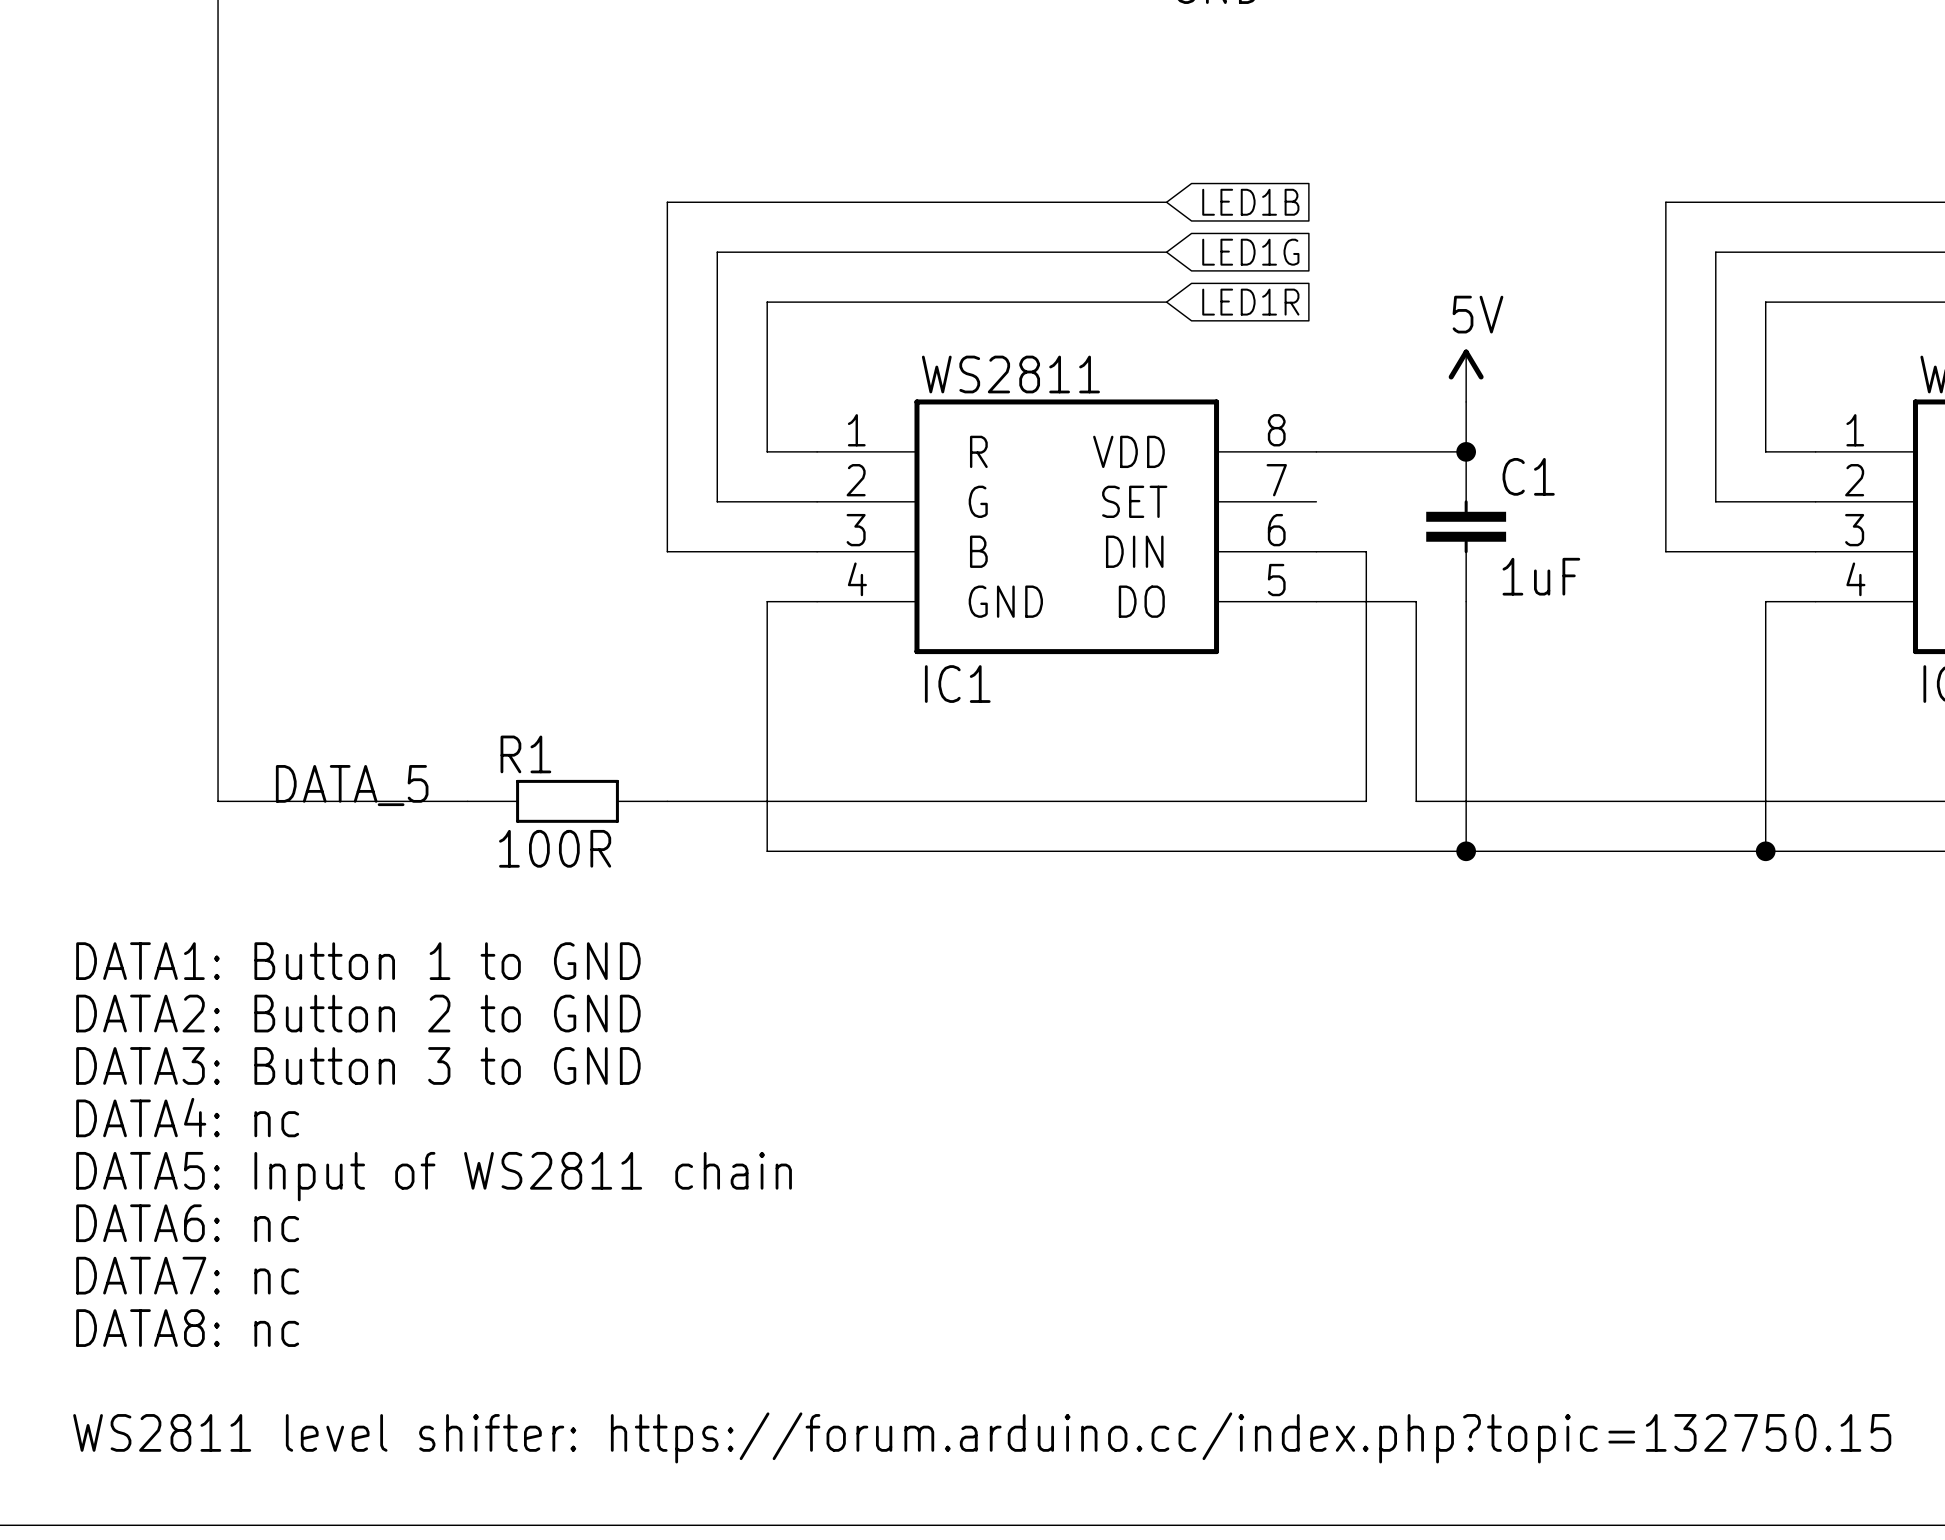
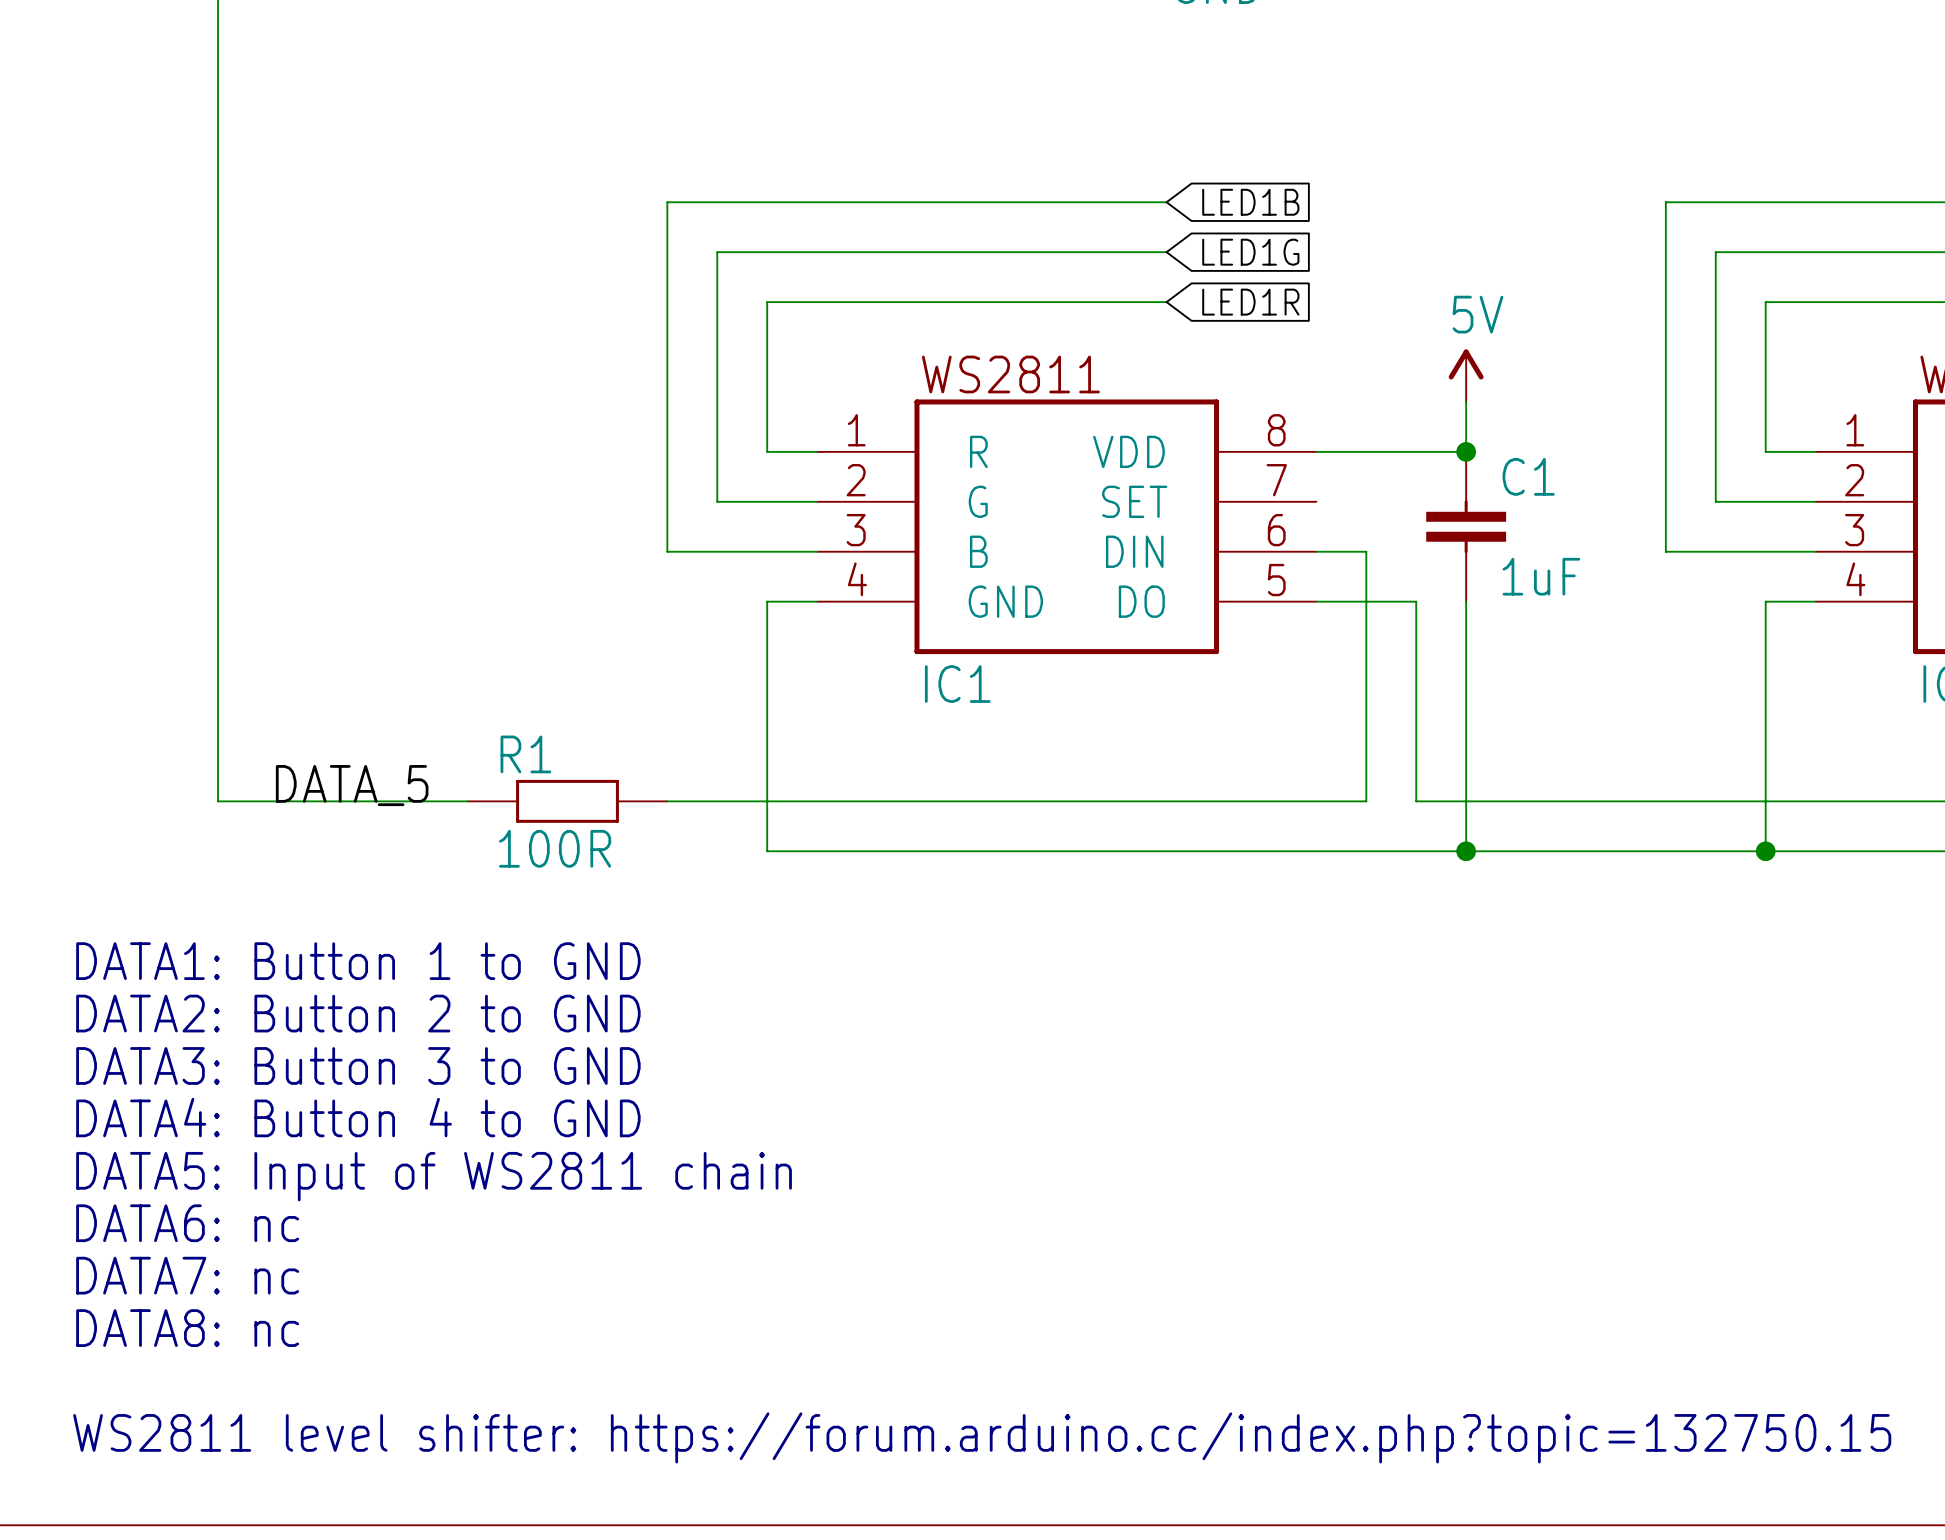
text: DATA4: nc (187, 1117) -> DATA4: Button 4 to GND (358, 1117)

